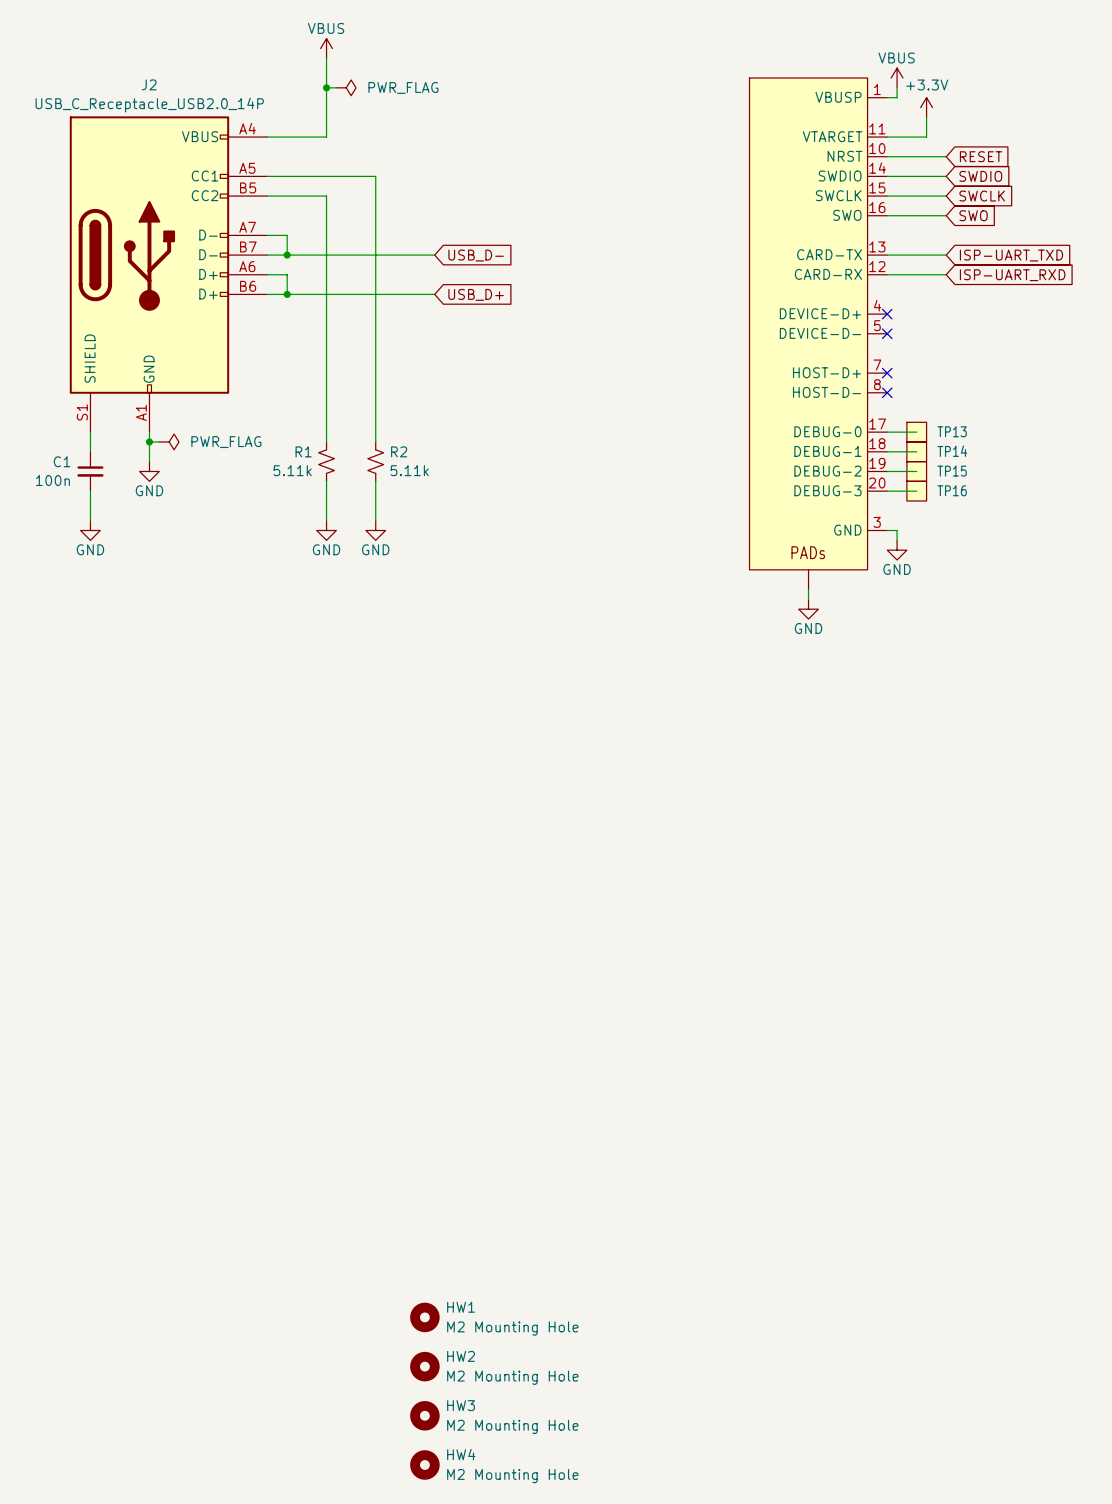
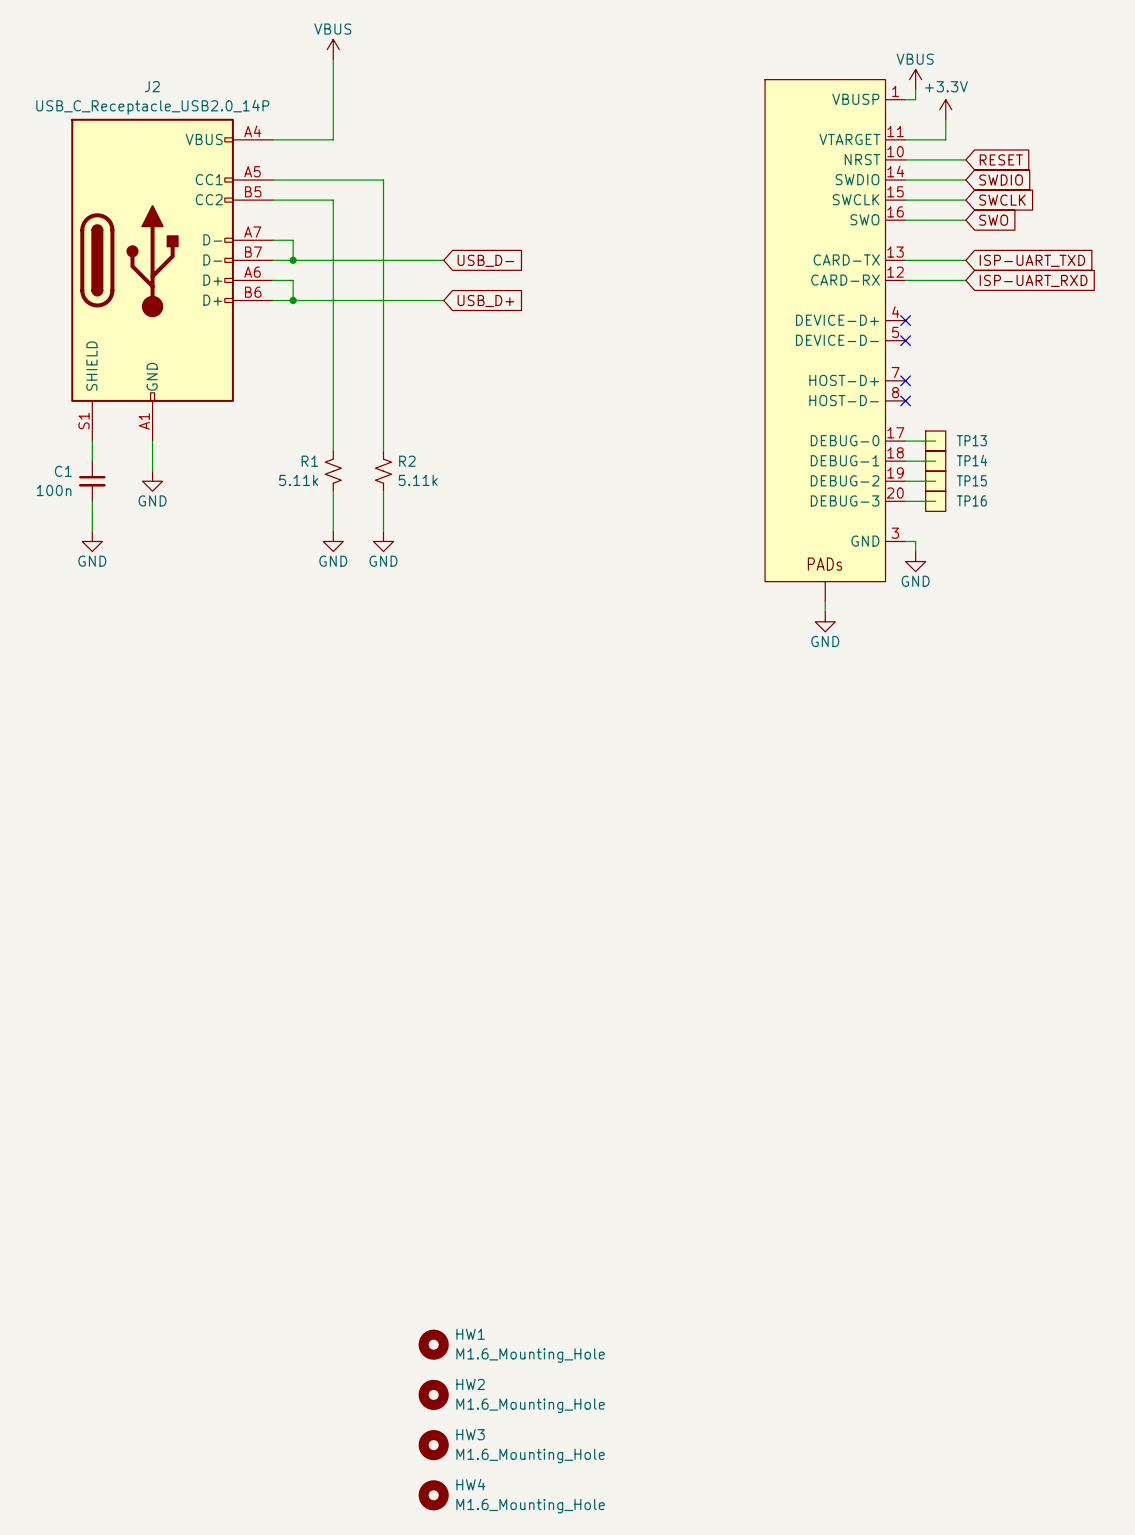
wire: (326, 87) (336, 87) -> none
junction: (326, 87) -> none
power symbol: PWR_FLAG (346, 87) -> none
wire: (149, 441) (159, 441) -> none
junction: (149, 441) -> none
power symbol: PWR_FLAG (169, 441) -> none
HW1 value: M2 Mounting Hole (512, 1328) -> M1.6_Mounting_Hole (530, 1355)
HW2 value: M2 Mounting Hole (512, 1377) -> M1.6_Mounting_Hole (530, 1405)
HW3 value: M2 Mounting Hole (512, 1426) -> M1.6_Mounting_Hole (530, 1455)
HW4 value: M2 Mounting Hole (512, 1476) -> M1.6_Mounting_Hole (530, 1506)

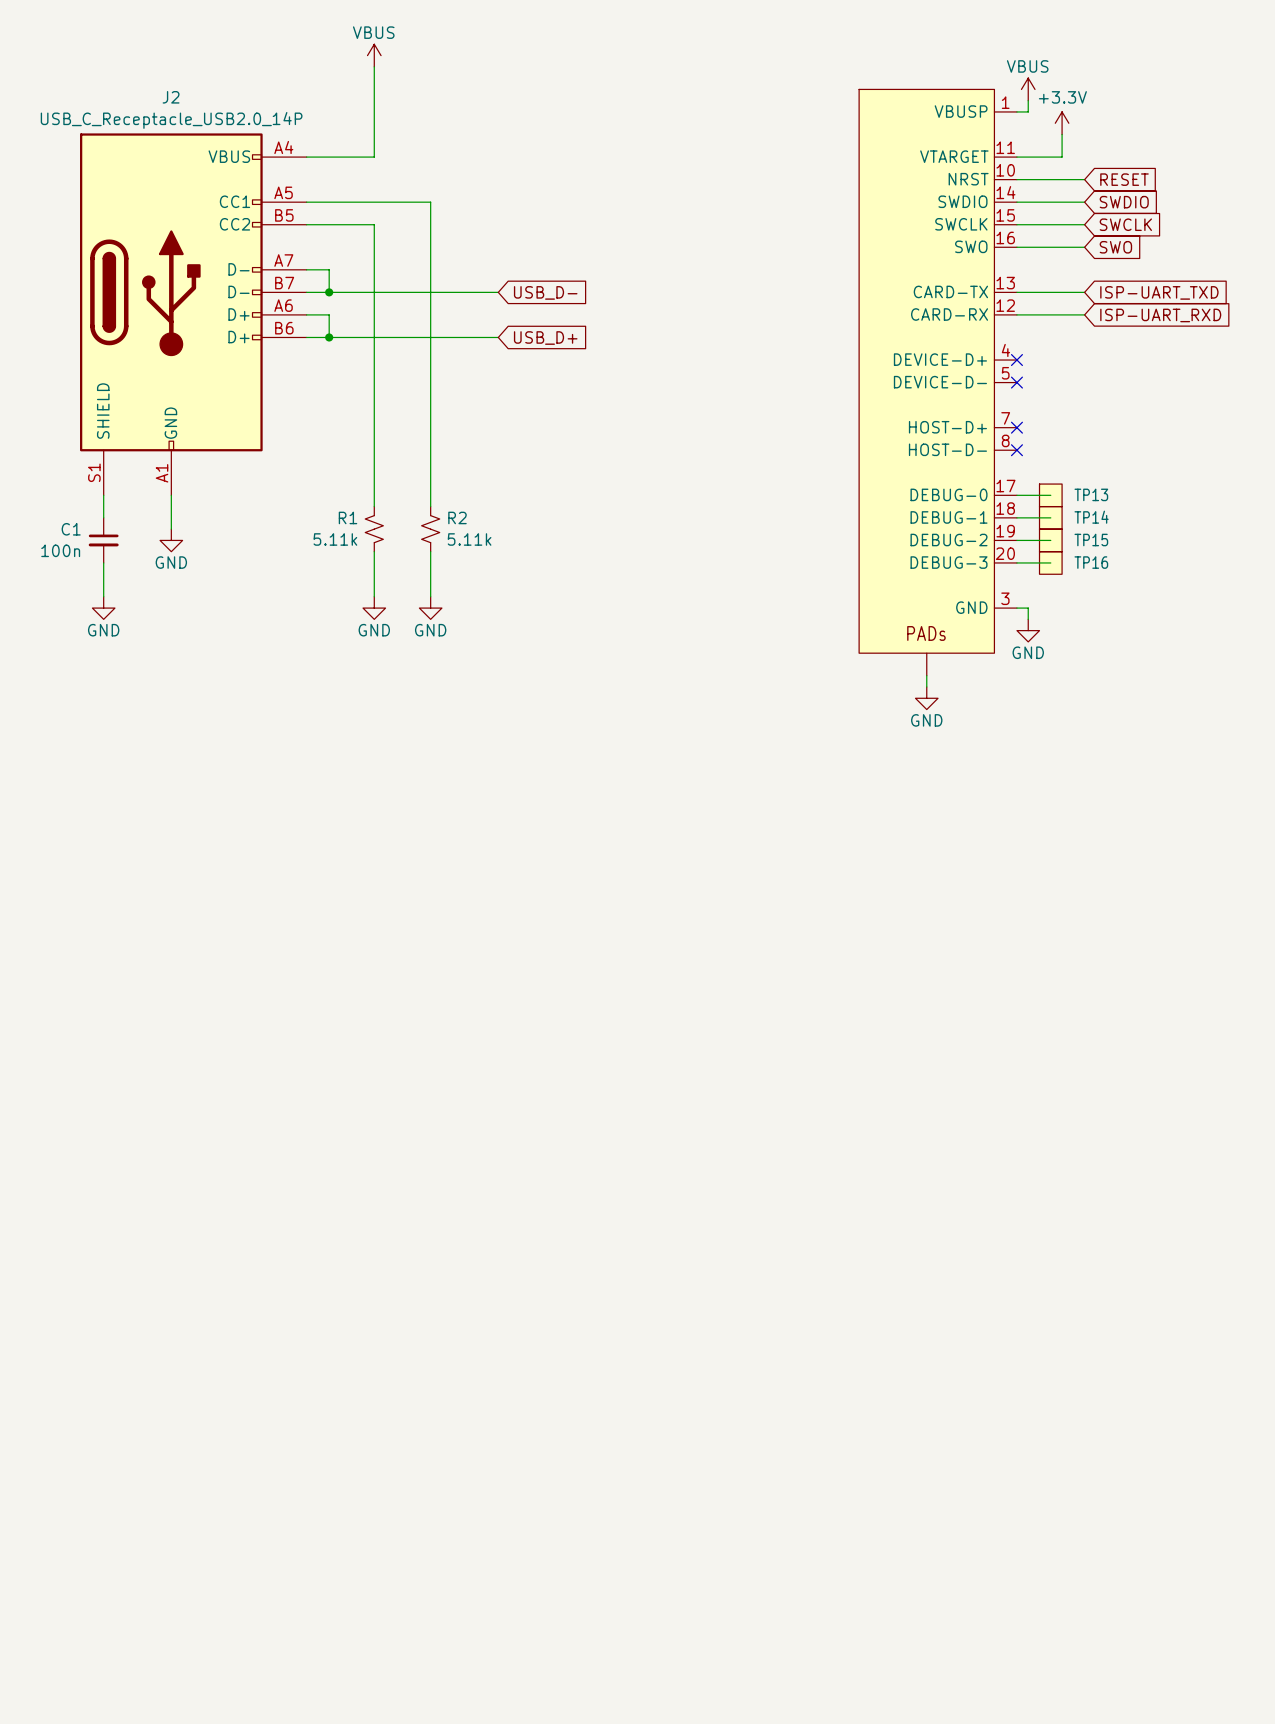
HW1: M1.6_Mounting_Hole (433, 1344) -> none
HW2: M1.6_Mounting_Hole (433, 1394) -> none
HW3: M1.6_Mounting_Hole (433, 1445) -> none
HW4: M1.6_Mounting_Hole (433, 1495) -> none

